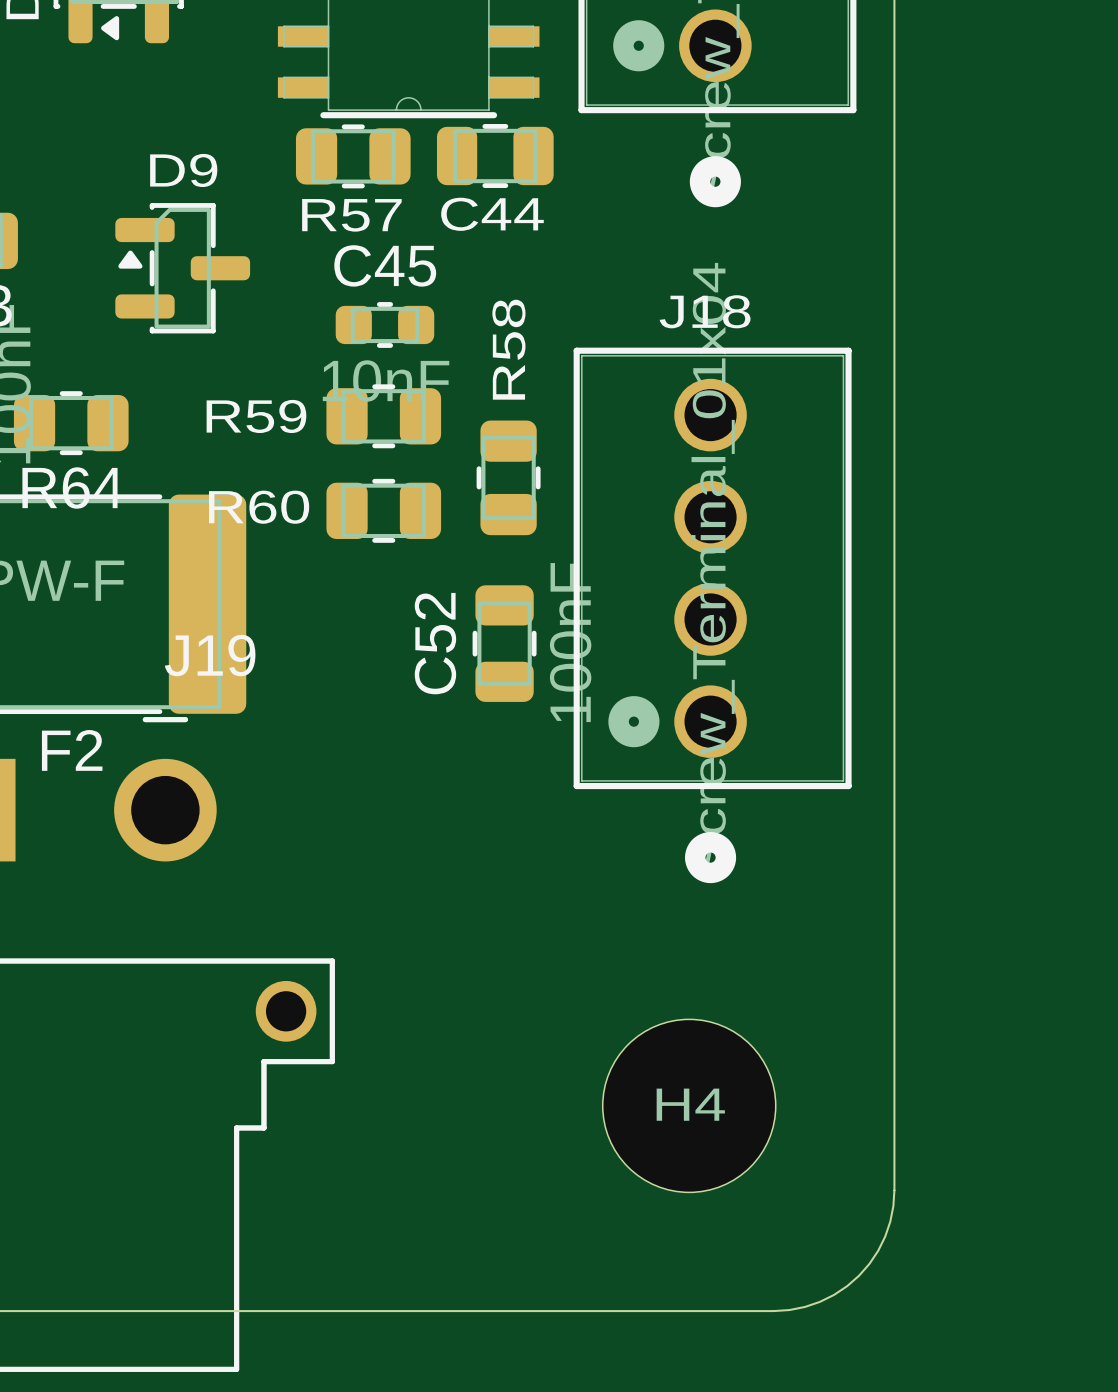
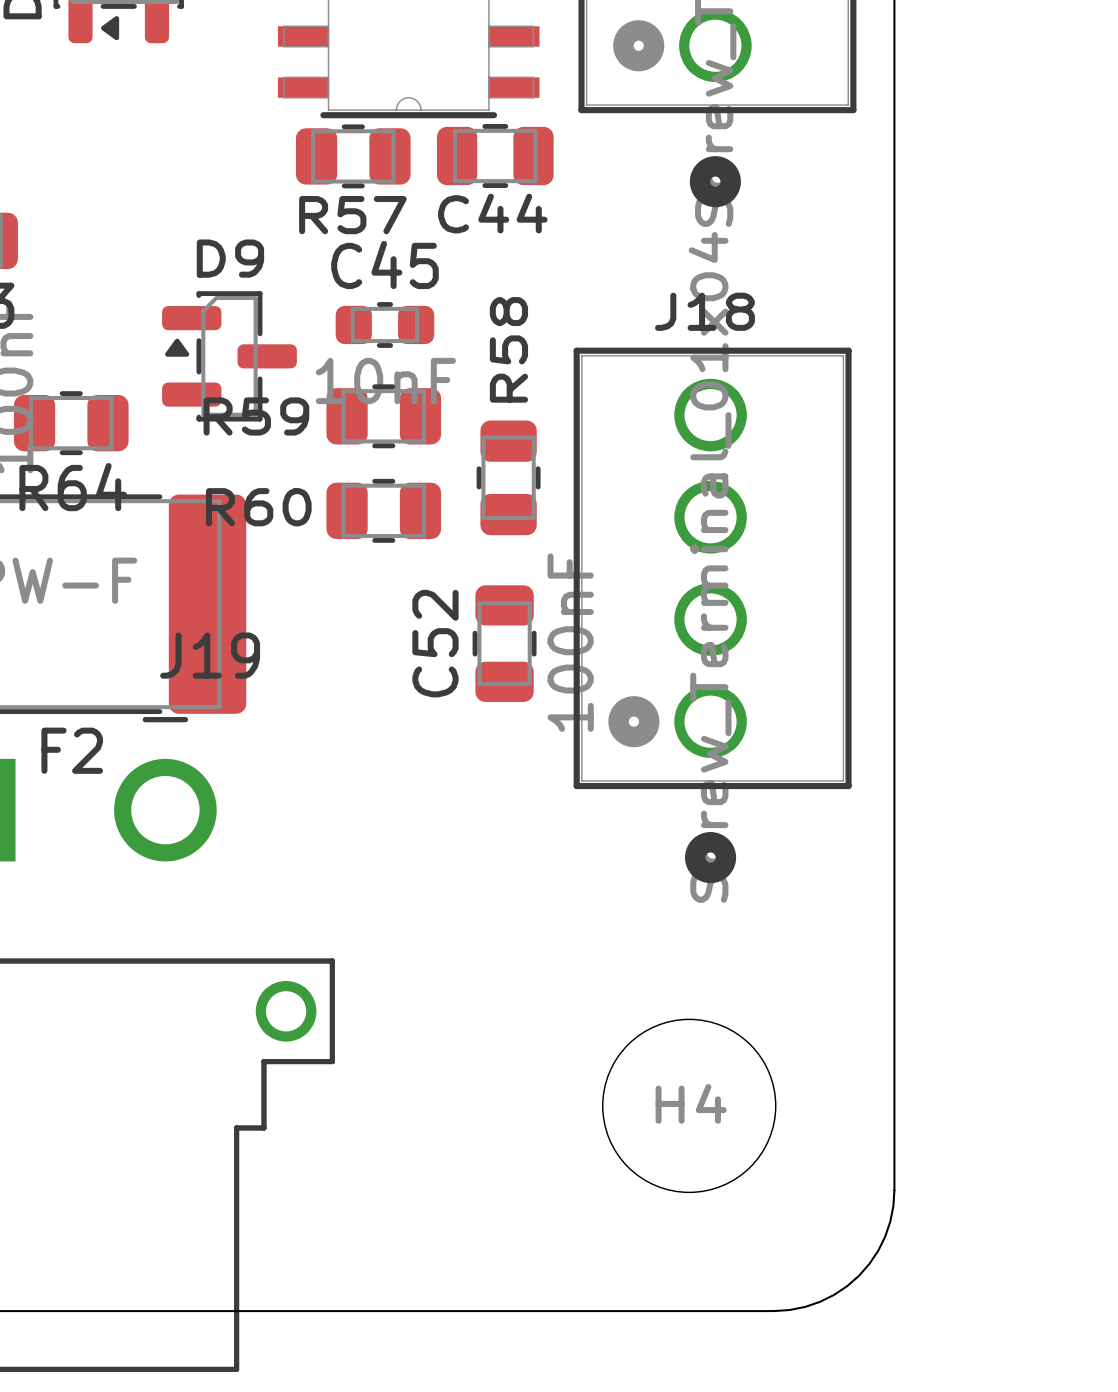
D9 position: (182, 268) -> (229, 356)

